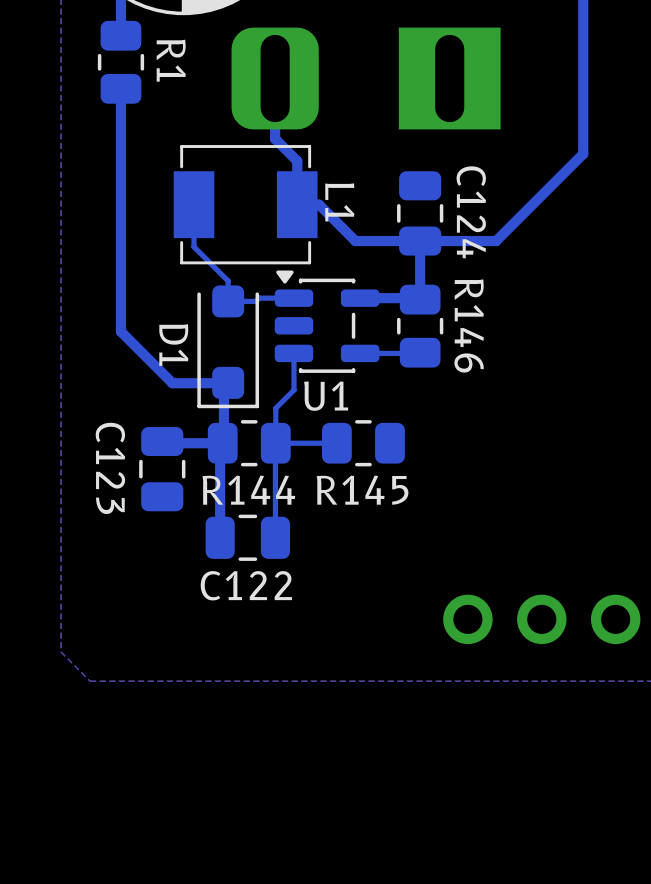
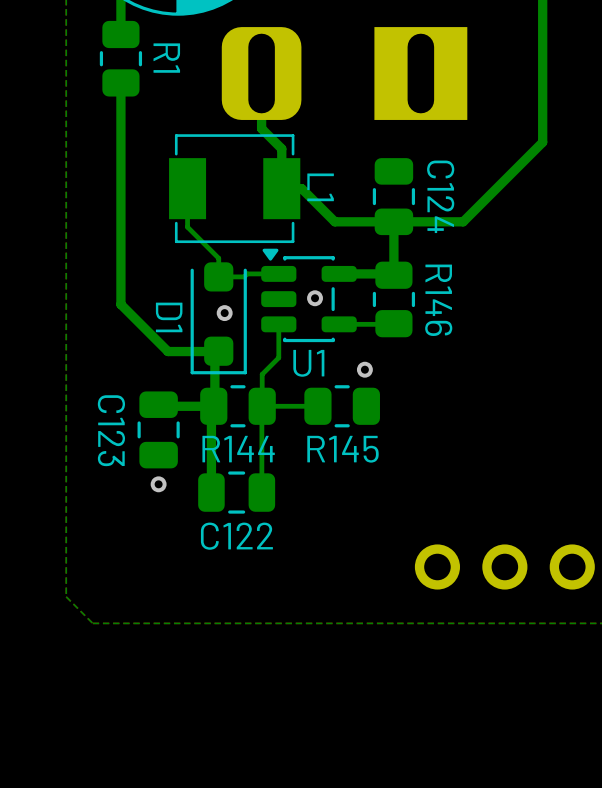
via: none -> (315, 298)
via: none -> (224, 313)
via: none -> (364, 369)
via: none -> (158, 484)

